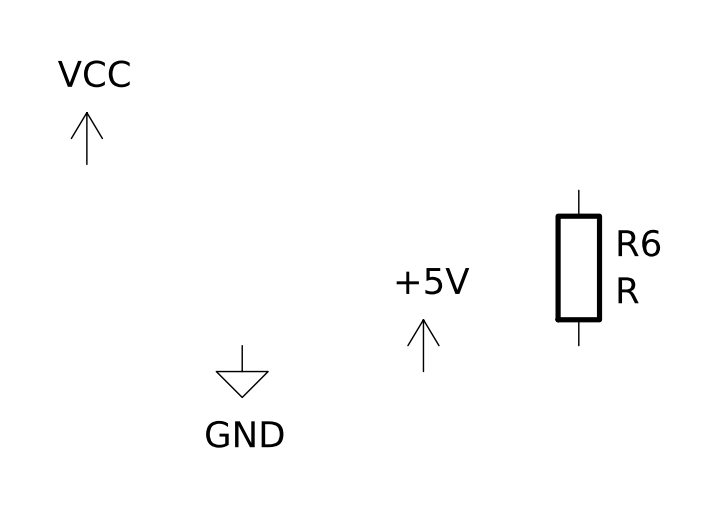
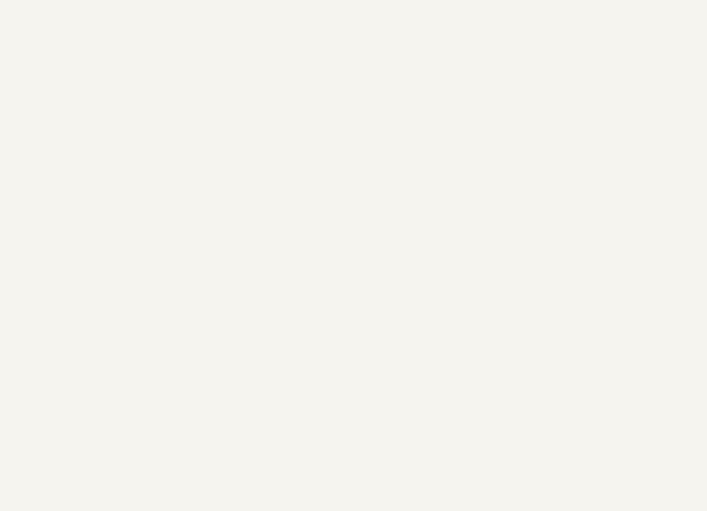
power symbol: VCC (86, 138) -> none
R6: R (578, 267) -> none
power symbol: +5V (423, 345) -> none
power symbol: GND (242, 371) -> none

